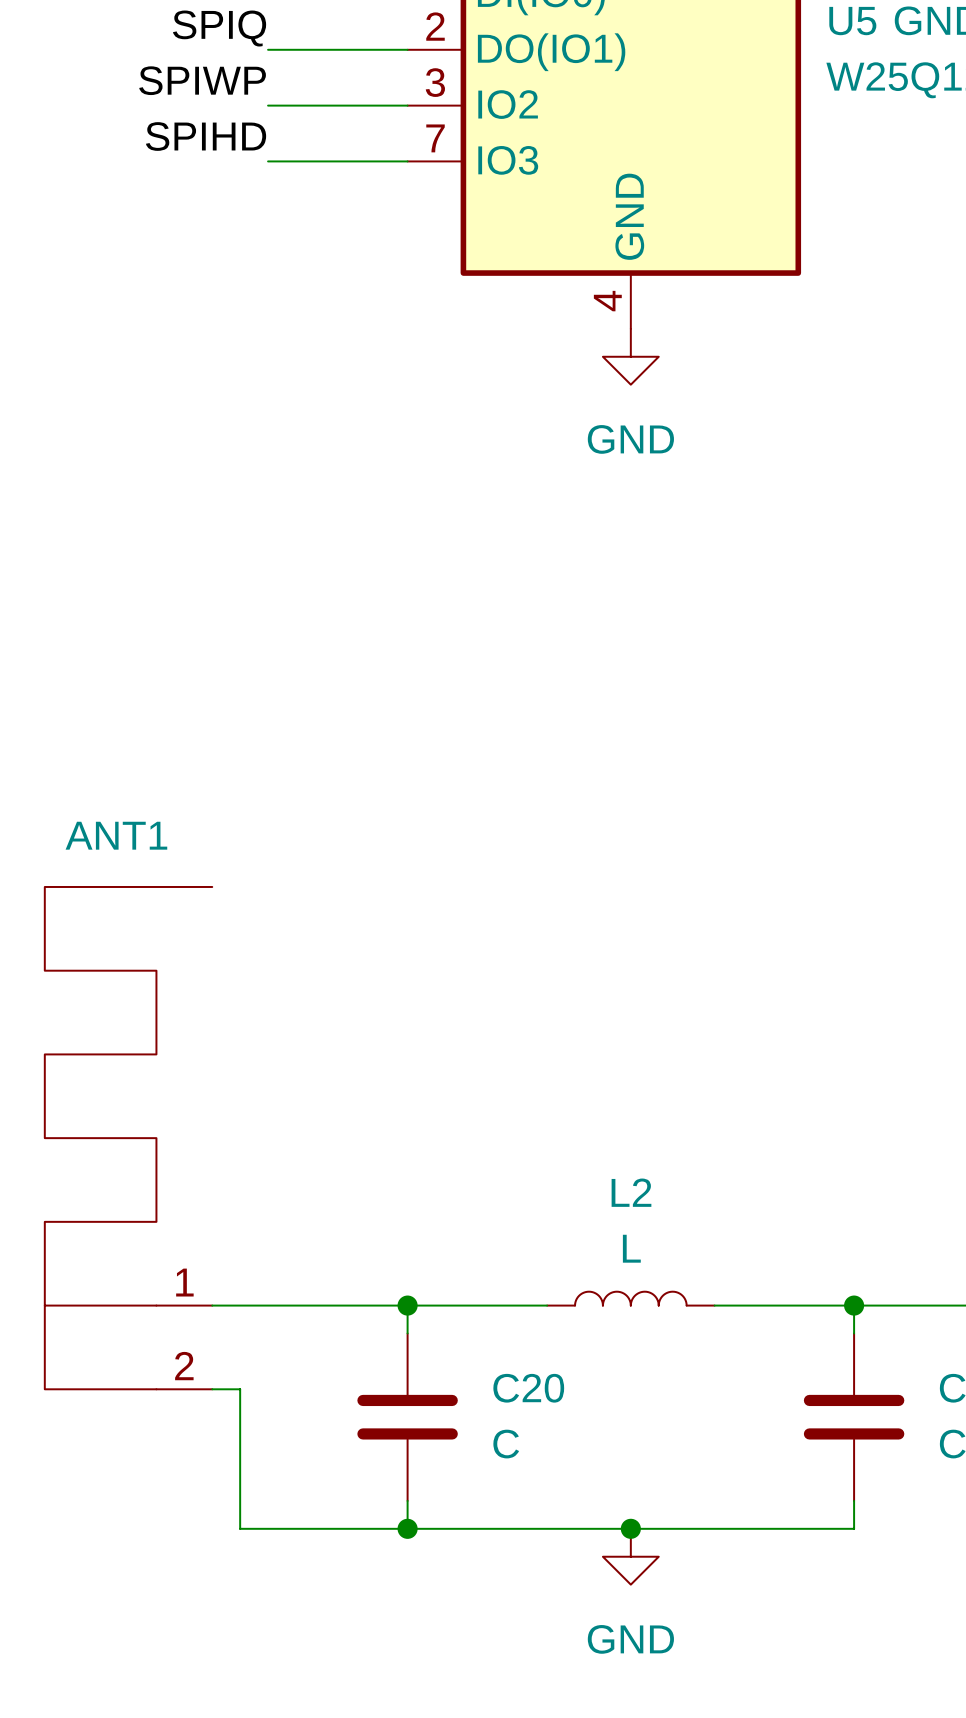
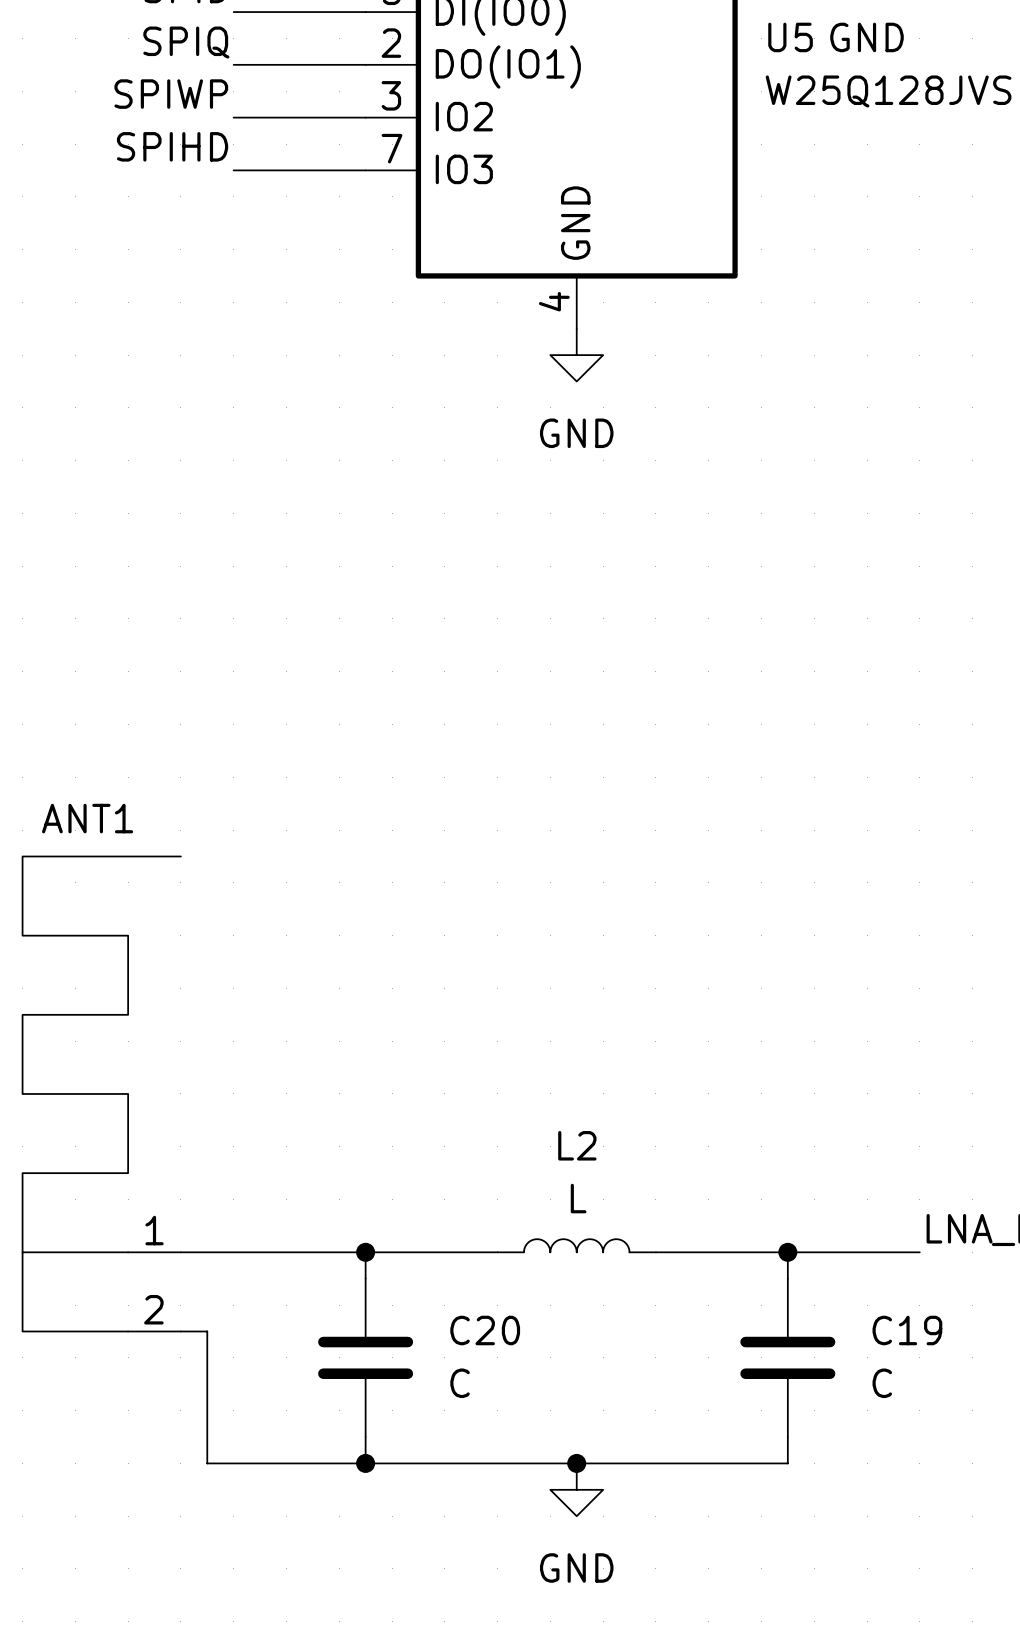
ANT1 name position: ANT1 (116, 835) -> ANT1 (87, 818)

